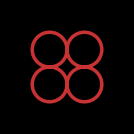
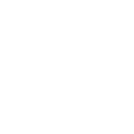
part: (49, 49) -> none
part: (84, 49) -> none
part: (49, 84) -> none
part: (84, 84) -> none

